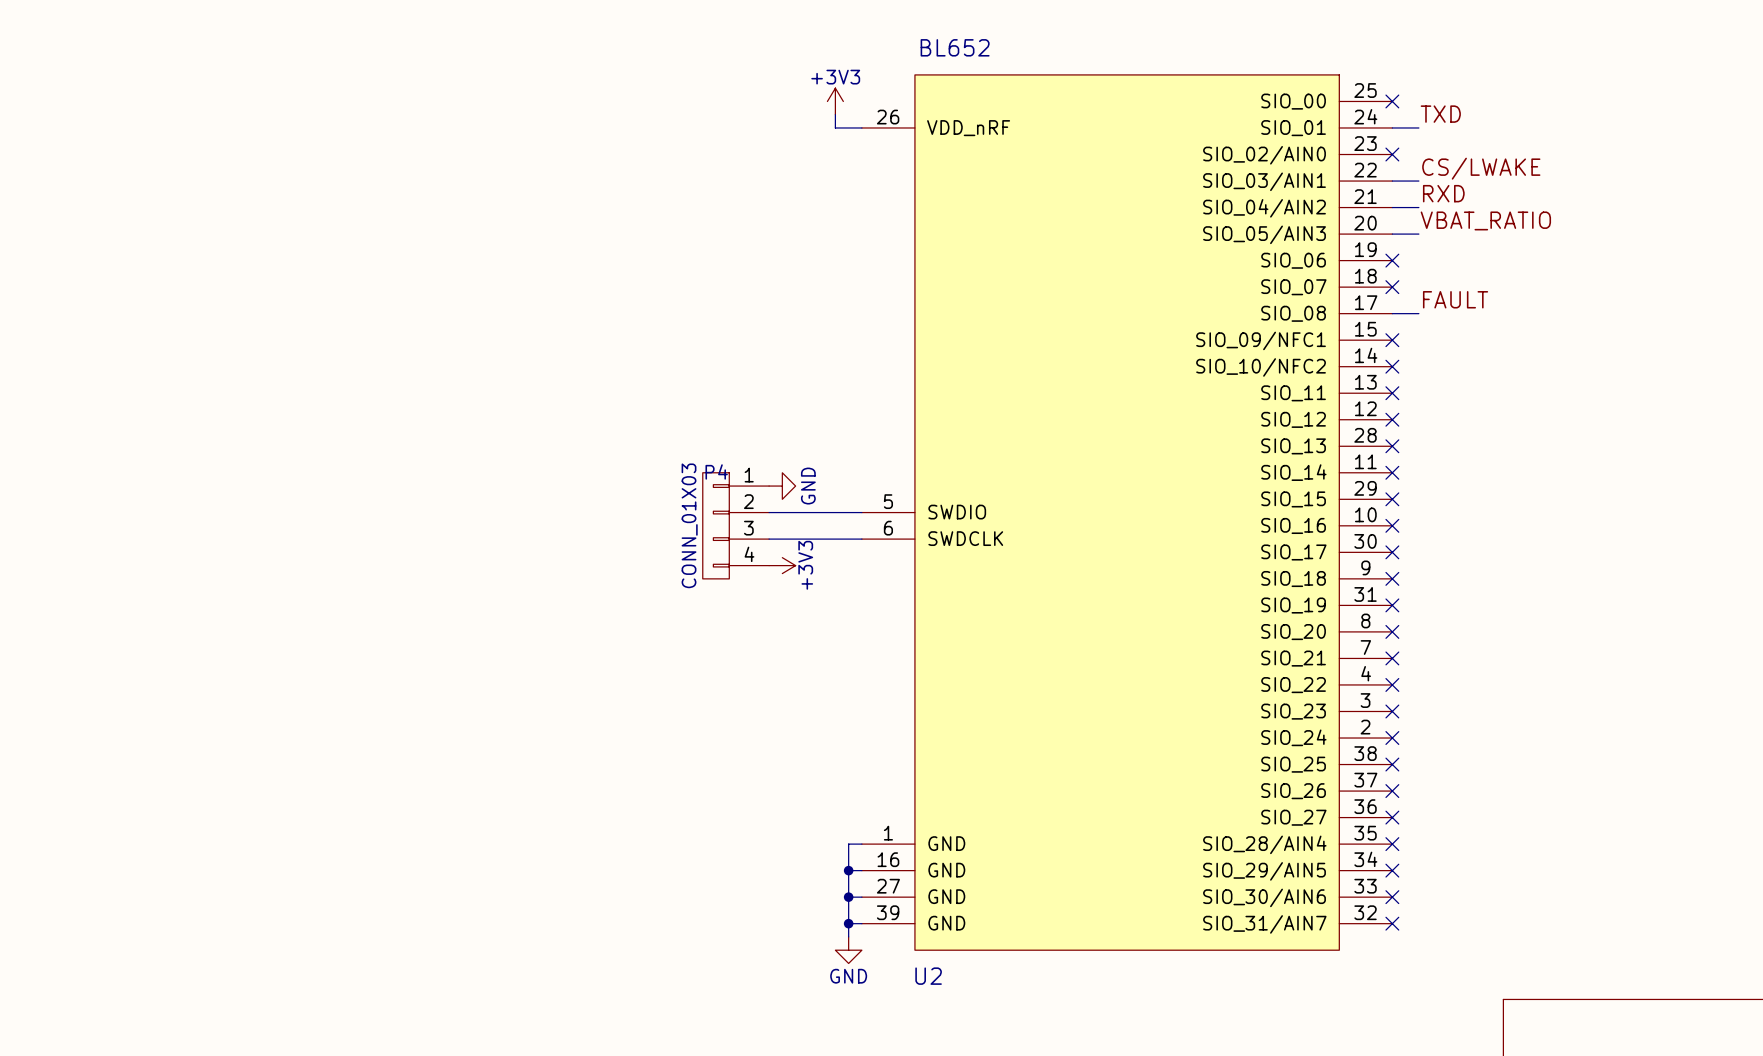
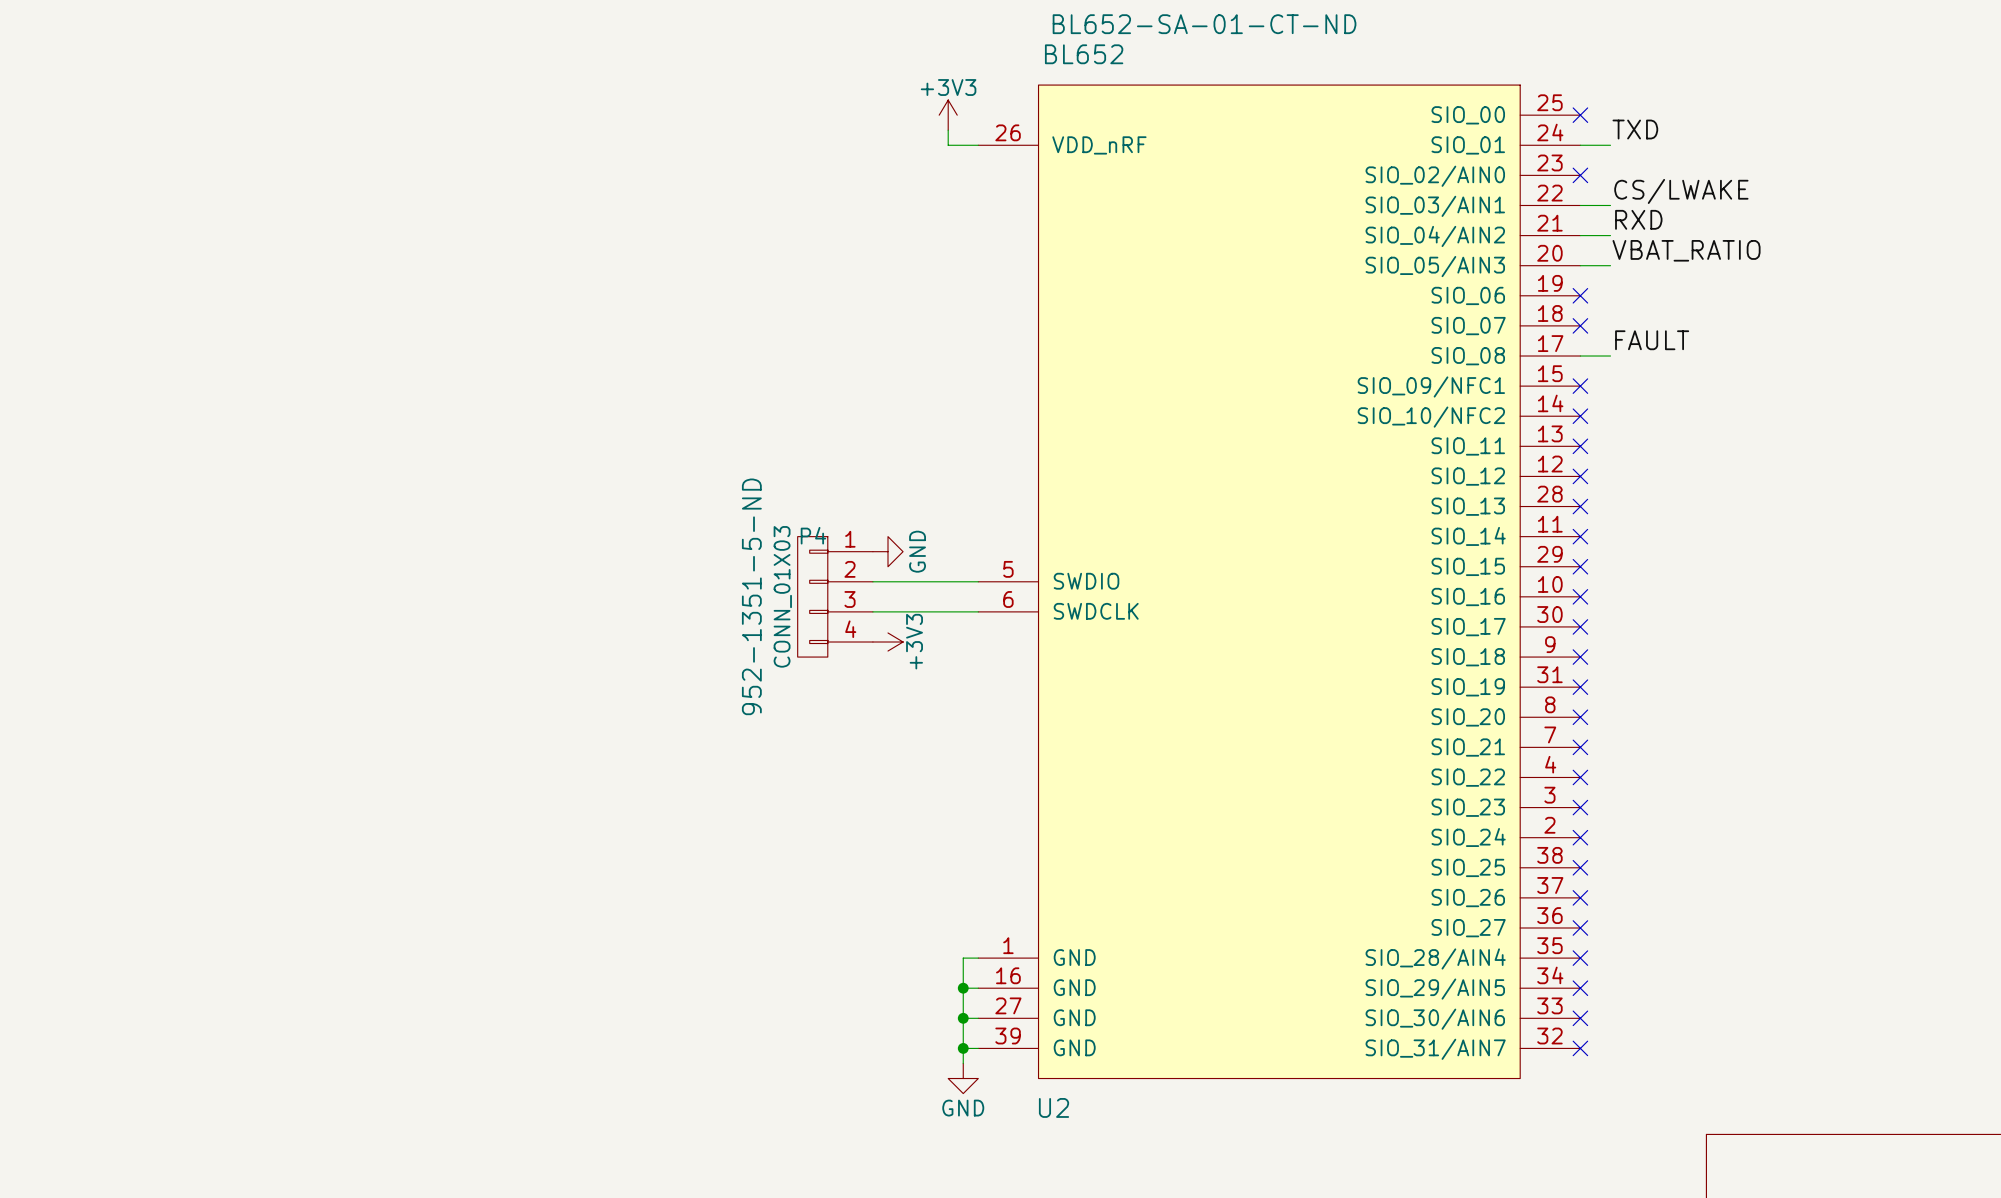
U2 text: none -> BL652-SA-01-CT-ND (1204, 24)
P4 text: none -> 952-1351-5-ND (751, 596)

